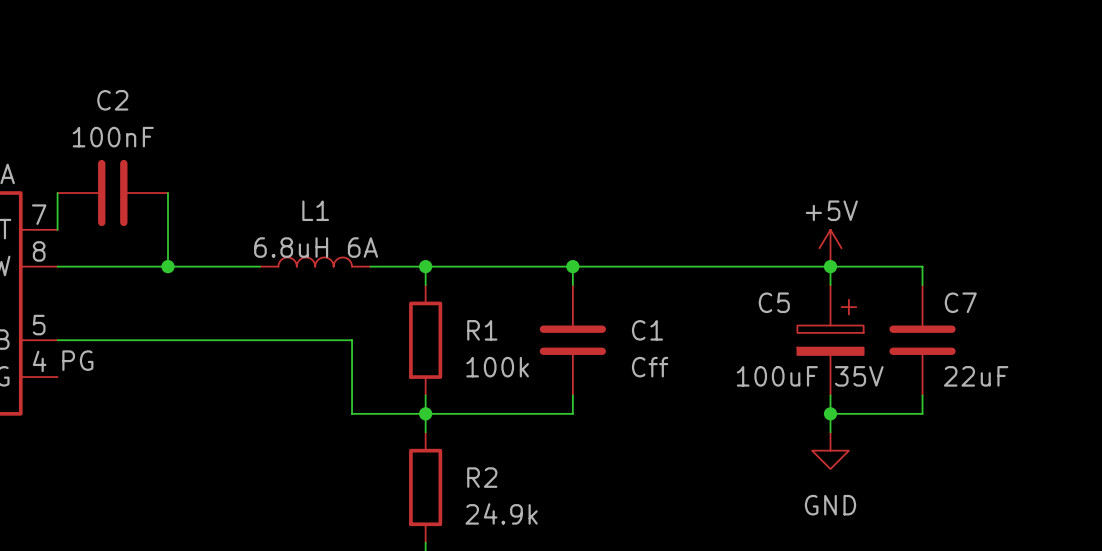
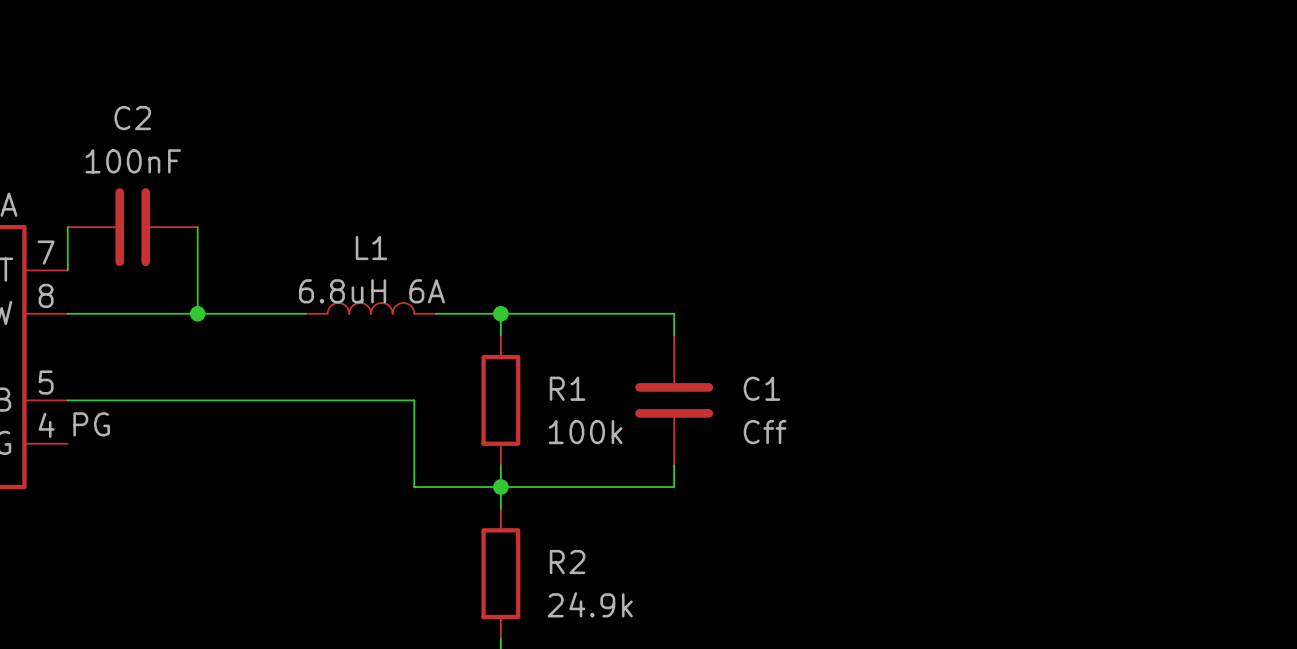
power symbol: +5V (830, 248) -> none
wire: (572, 266) (922, 266) (922, 285) -> none
junction: (572, 266) -> none
wire: (830, 266) (830, 285) -> none
junction: (830, 266) -> none
C5: 100uF 35V (830, 340) -> none
C7: 22uF (922, 340) -> none
wire: (830, 395) (830, 432) -> none
wire: (922, 395) (922, 413) (830, 413) -> none
junction: (830, 413) -> none
power symbol: GND (830, 450) -> none

